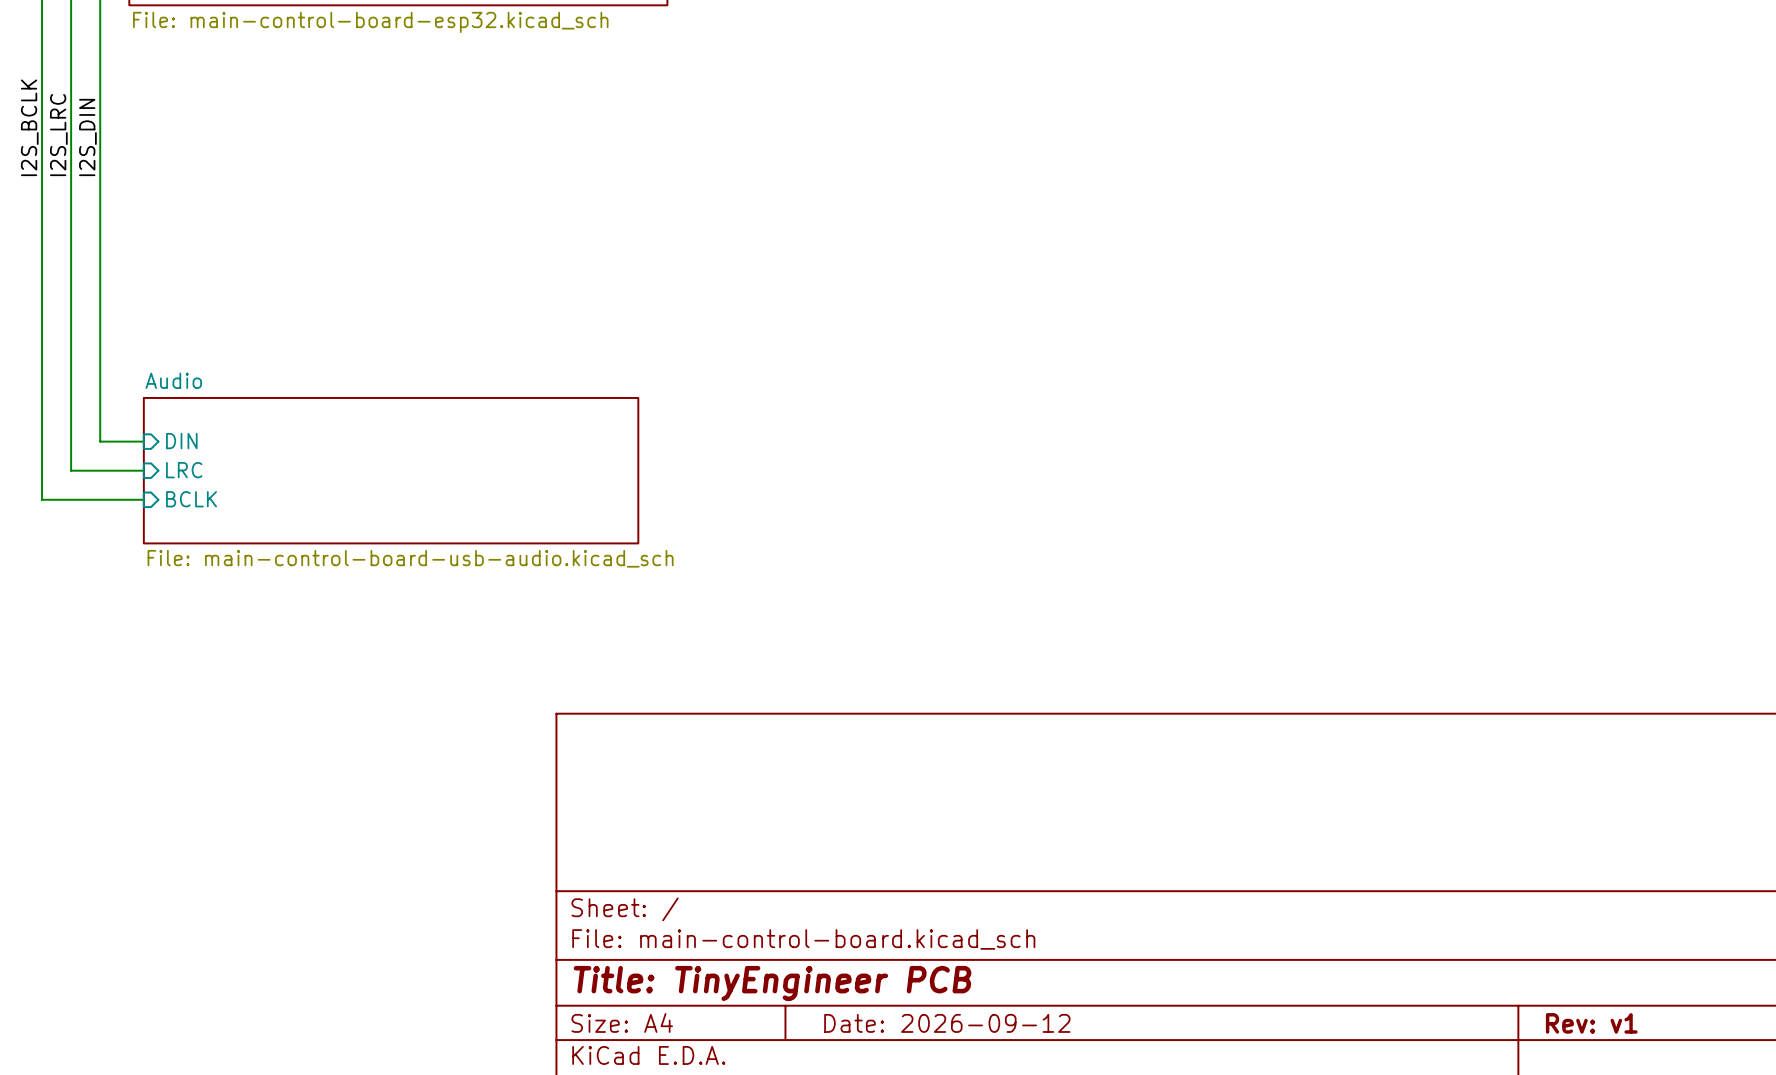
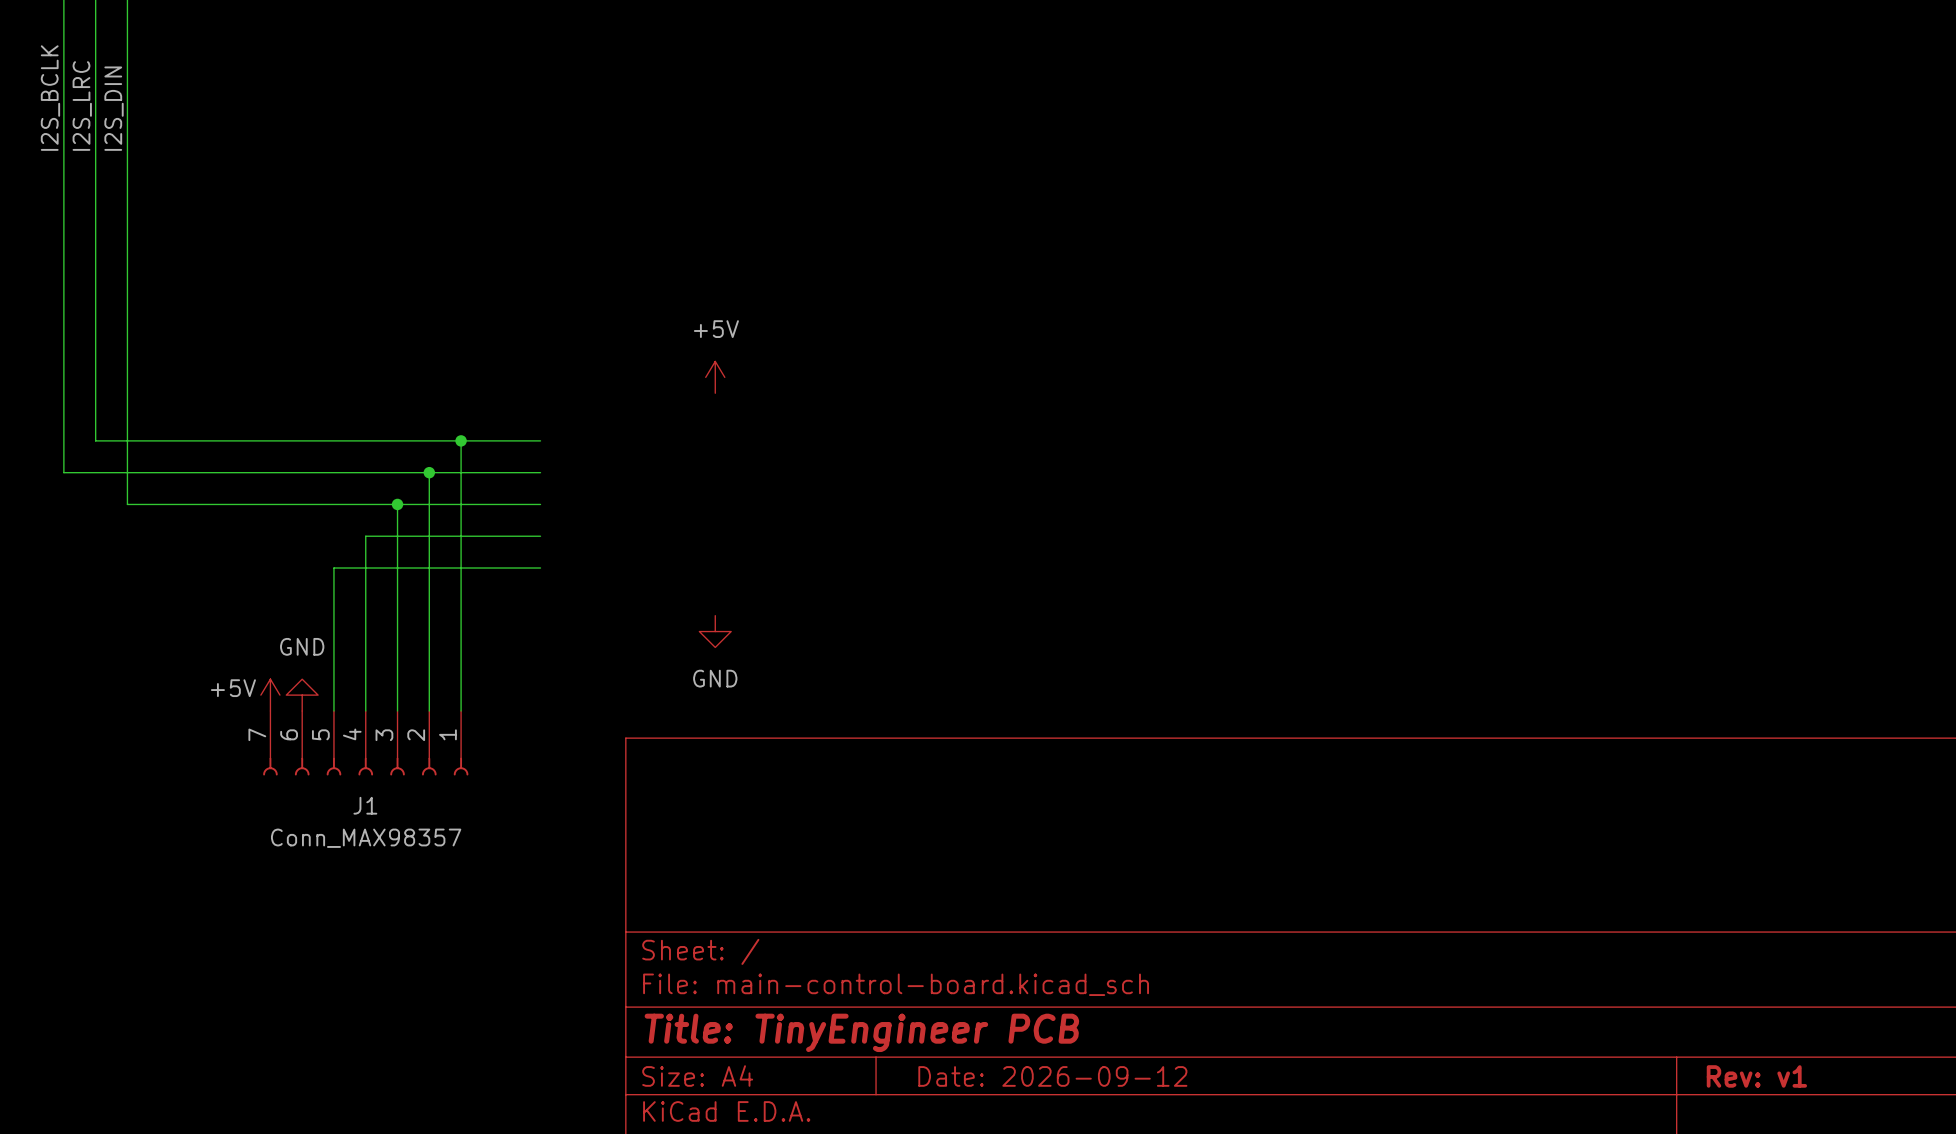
power symbol: none -> +5V (715, 377)
wire: (71, 441) (71, 470) -> (95, 440) (127, 440) (127, 504)
wire: none -> (175, 440) (540, 440)
sheet pin: DIN (181, 441) -> none
wire: none -> (461, 440) (461, 710)
junction: none -> (461, 440)
wire: (42, 470) (42, 499) (100, 499) -> (63, 472) (95, 472)
wire: none -> (175, 472) (540, 472)
sheet pin: LRC (184, 470) -> none
wire: none -> (429, 472) (429, 710)
junction: none -> (429, 472)
sheet Audio: File: main-control-board-usb-audio.kicad_sch (391, 470) -> none
wire: none -> (175, 504) (540, 504)
sheet pin: BCLK (191, 499) -> none
wire: none -> (397, 504) (397, 710)
junction: none -> (397, 504)
wire: none -> (540, 536) (365, 536) (365, 710)
wire: none -> (540, 568) (333, 568) (333, 710)
power symbol: none -> GND (715, 631)
power symbol: none -> +5V (270, 695)
power symbol: none -> GND (302, 695)
J1: none -> Conn_MAX98357 (365, 743)

